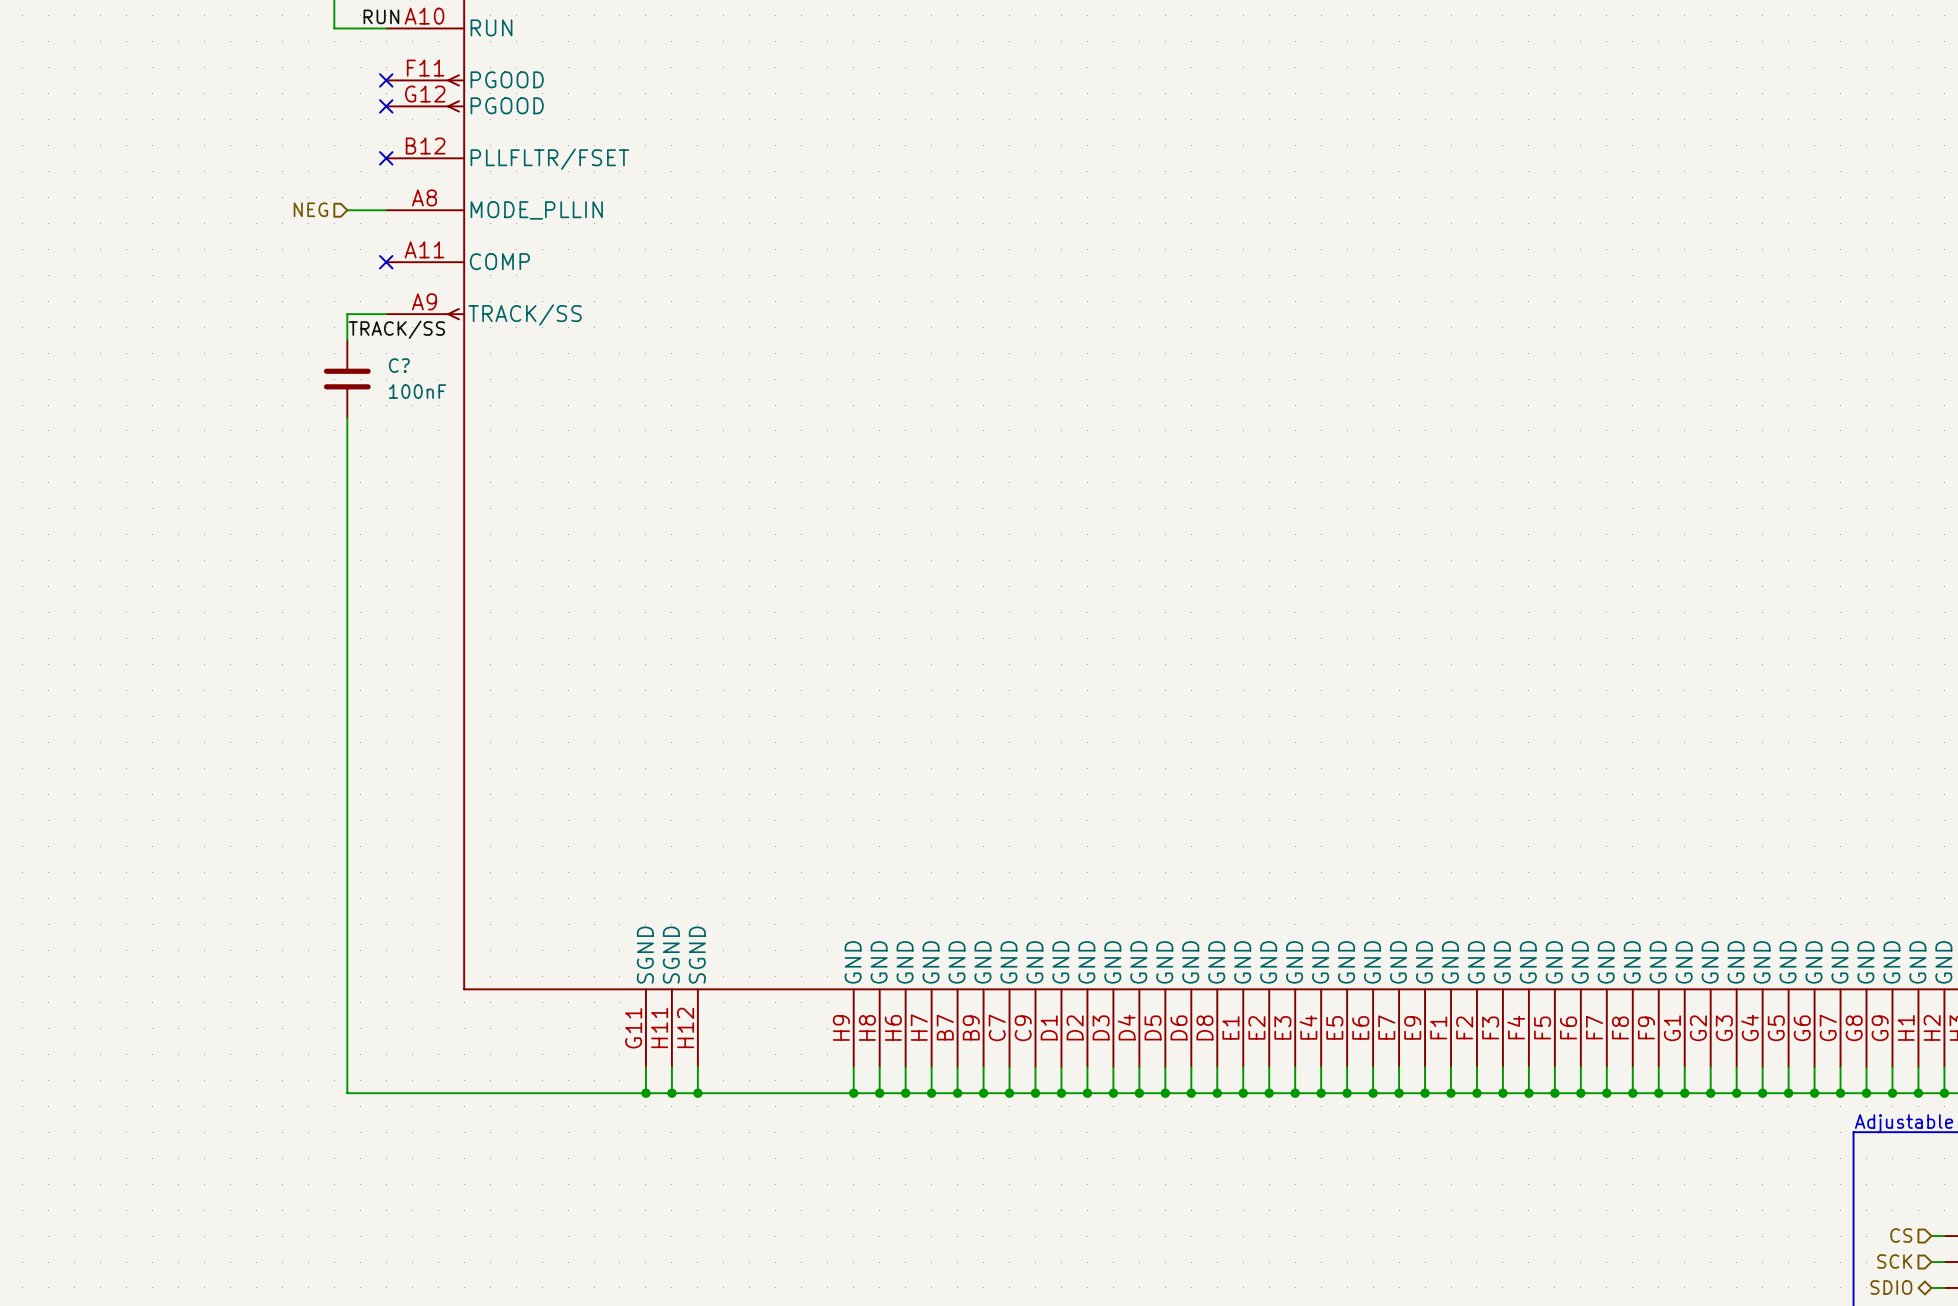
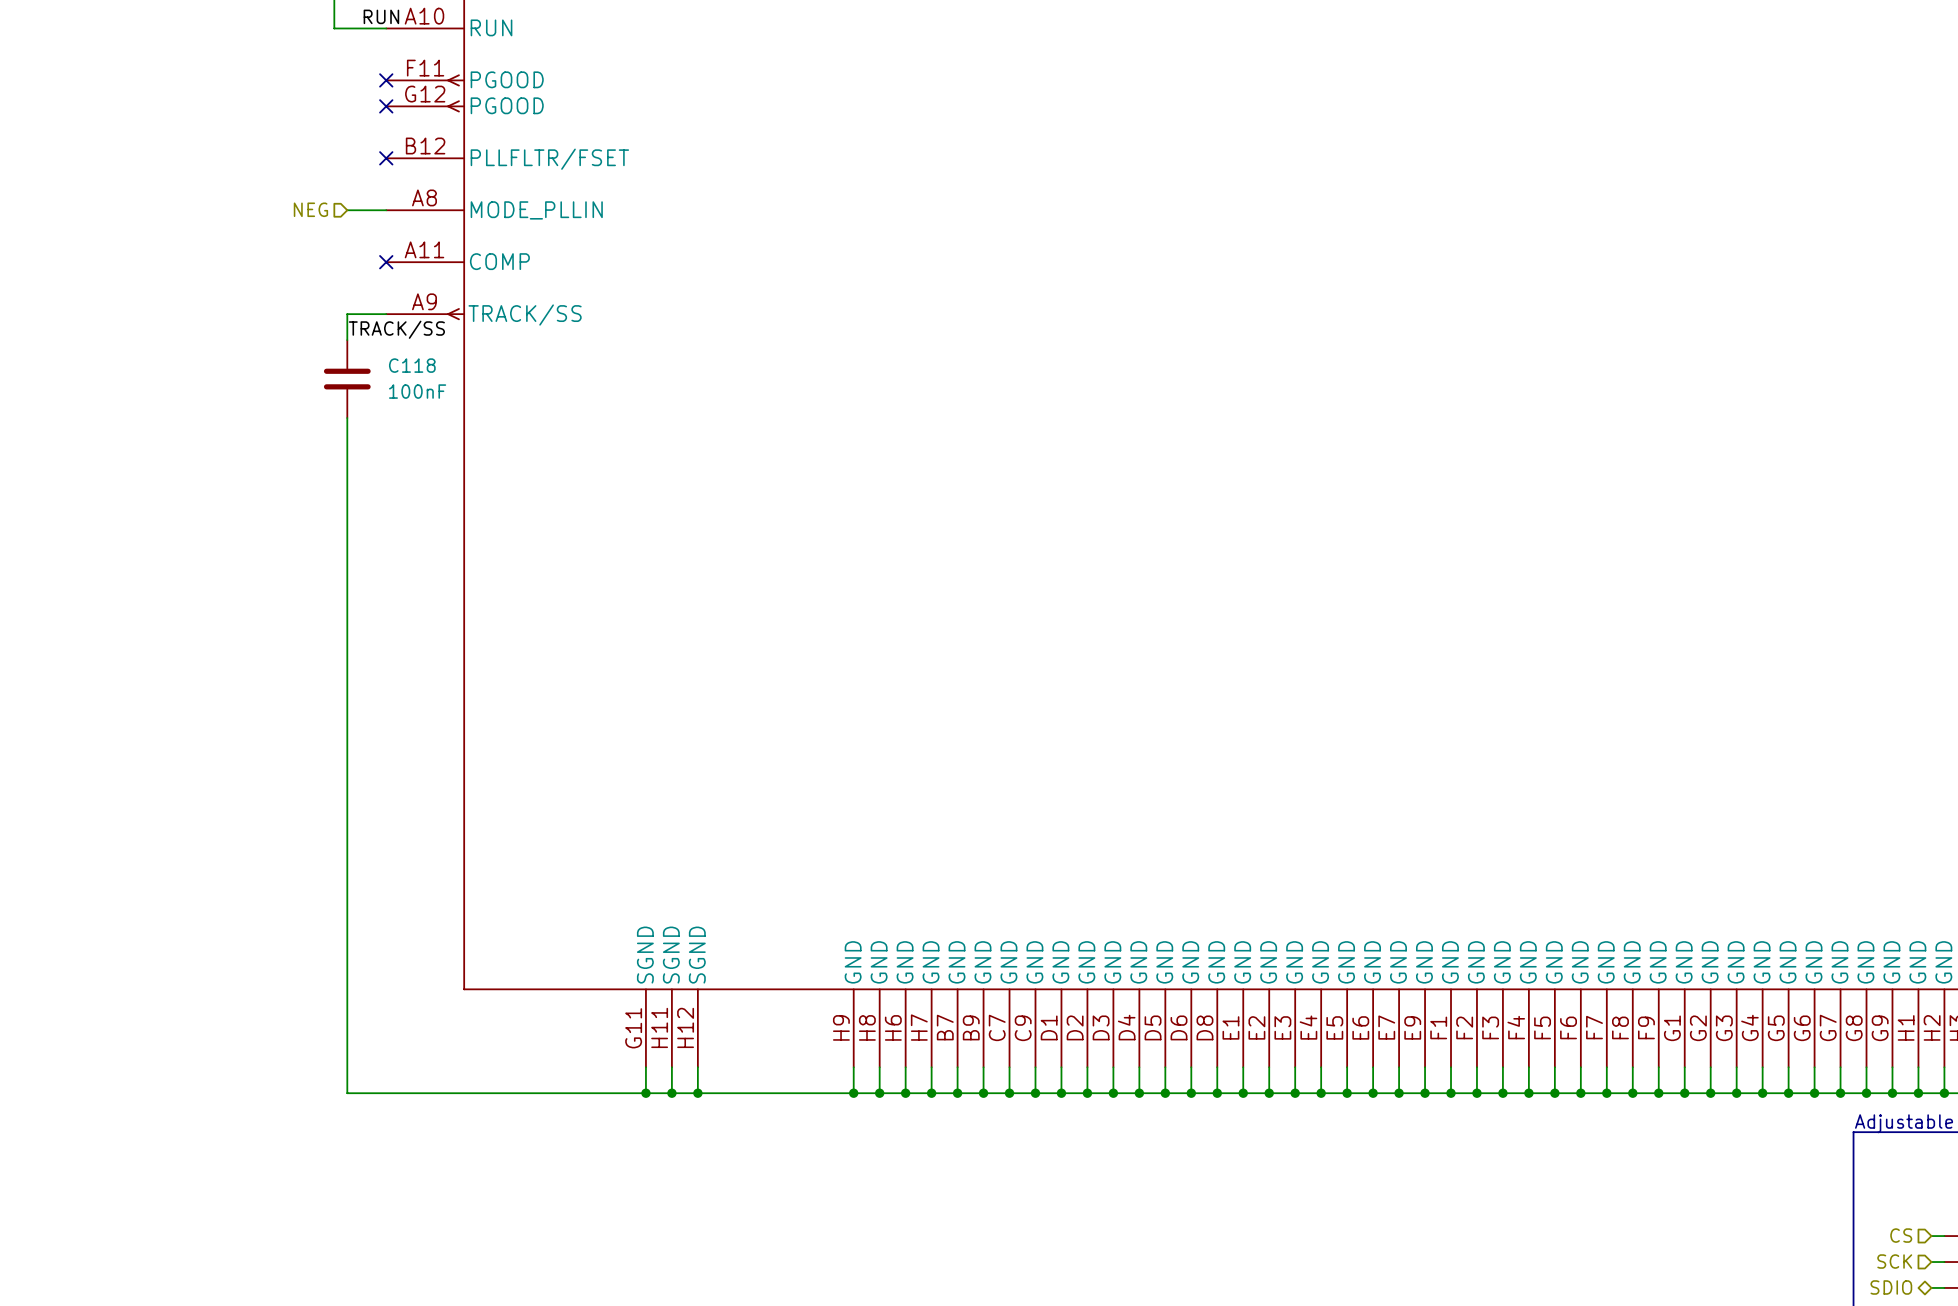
C? name: C? (399, 365) -> C118 (412, 365)

